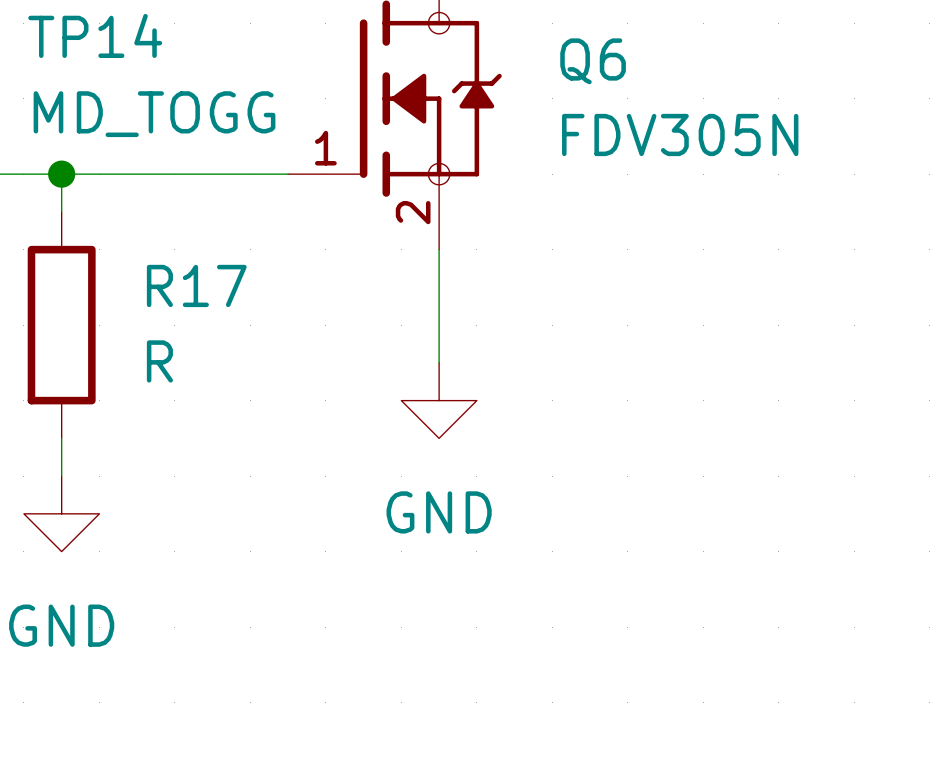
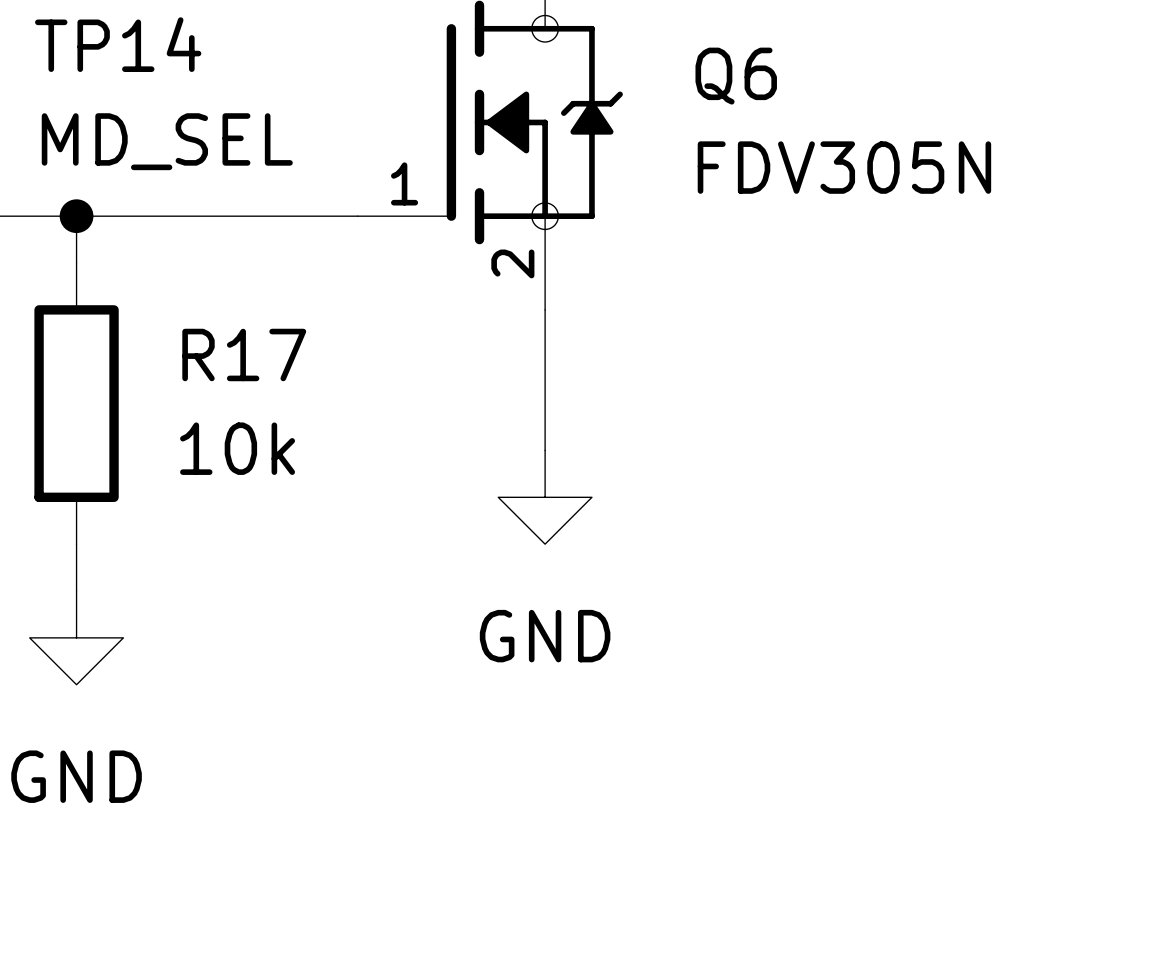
TP14 value: MD_TOGG (154, 114) -> MD_SEL (167, 141)
R17 value: R (159, 361) -> 10k (237, 448)

